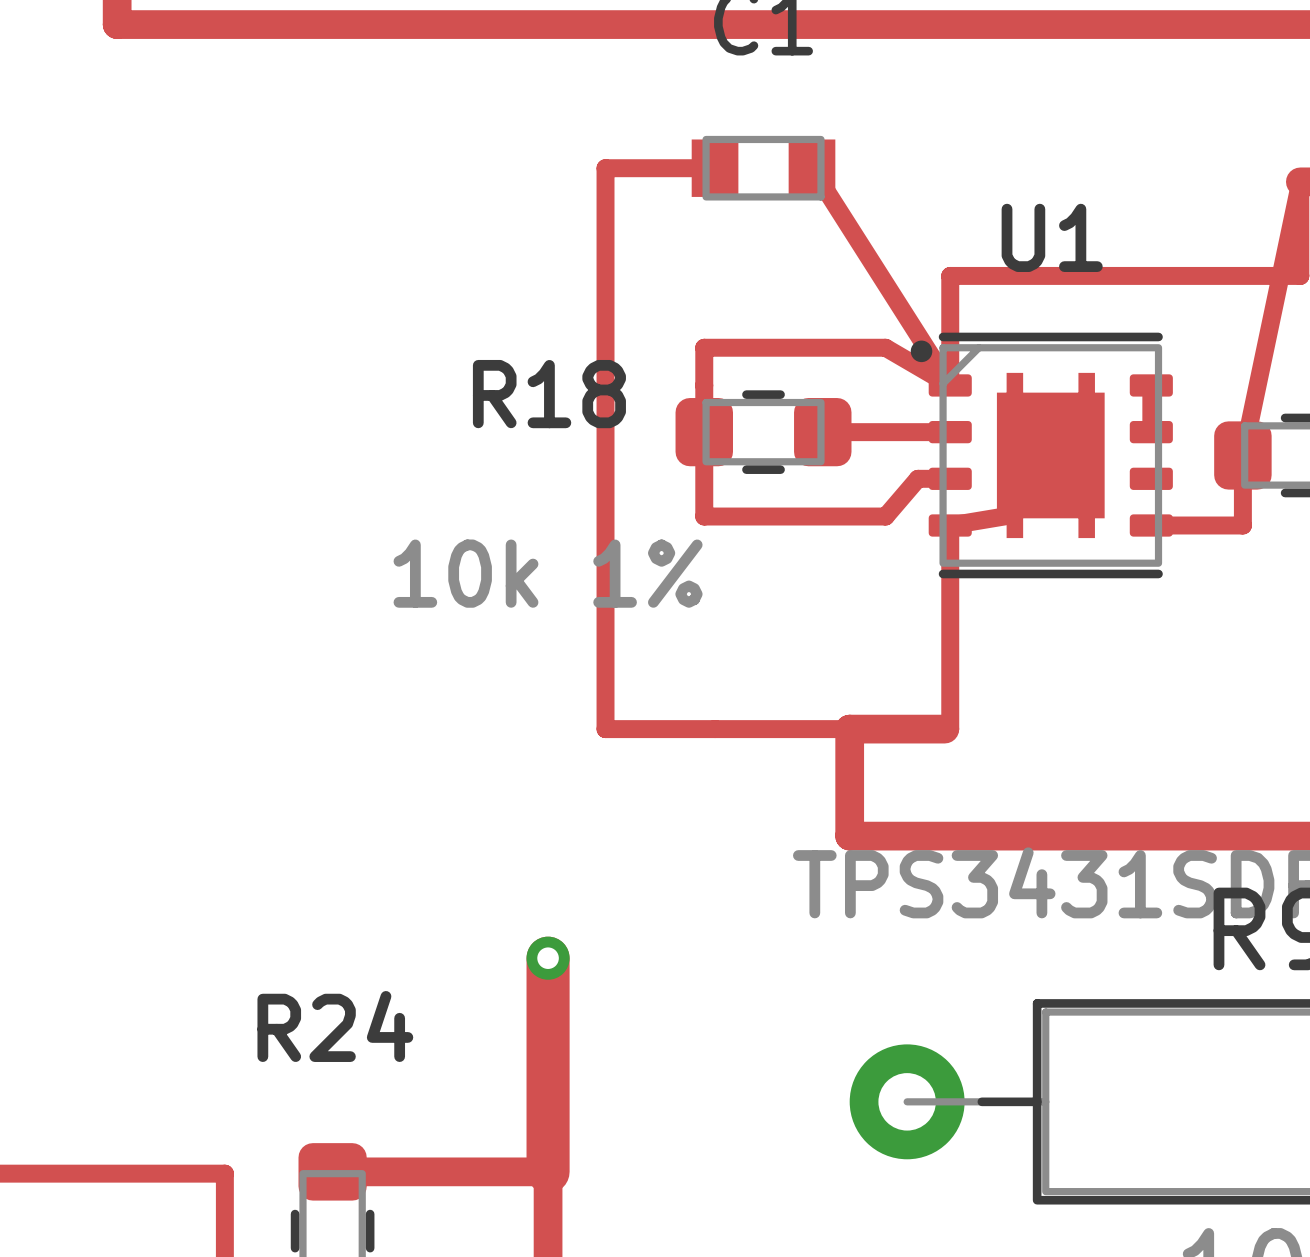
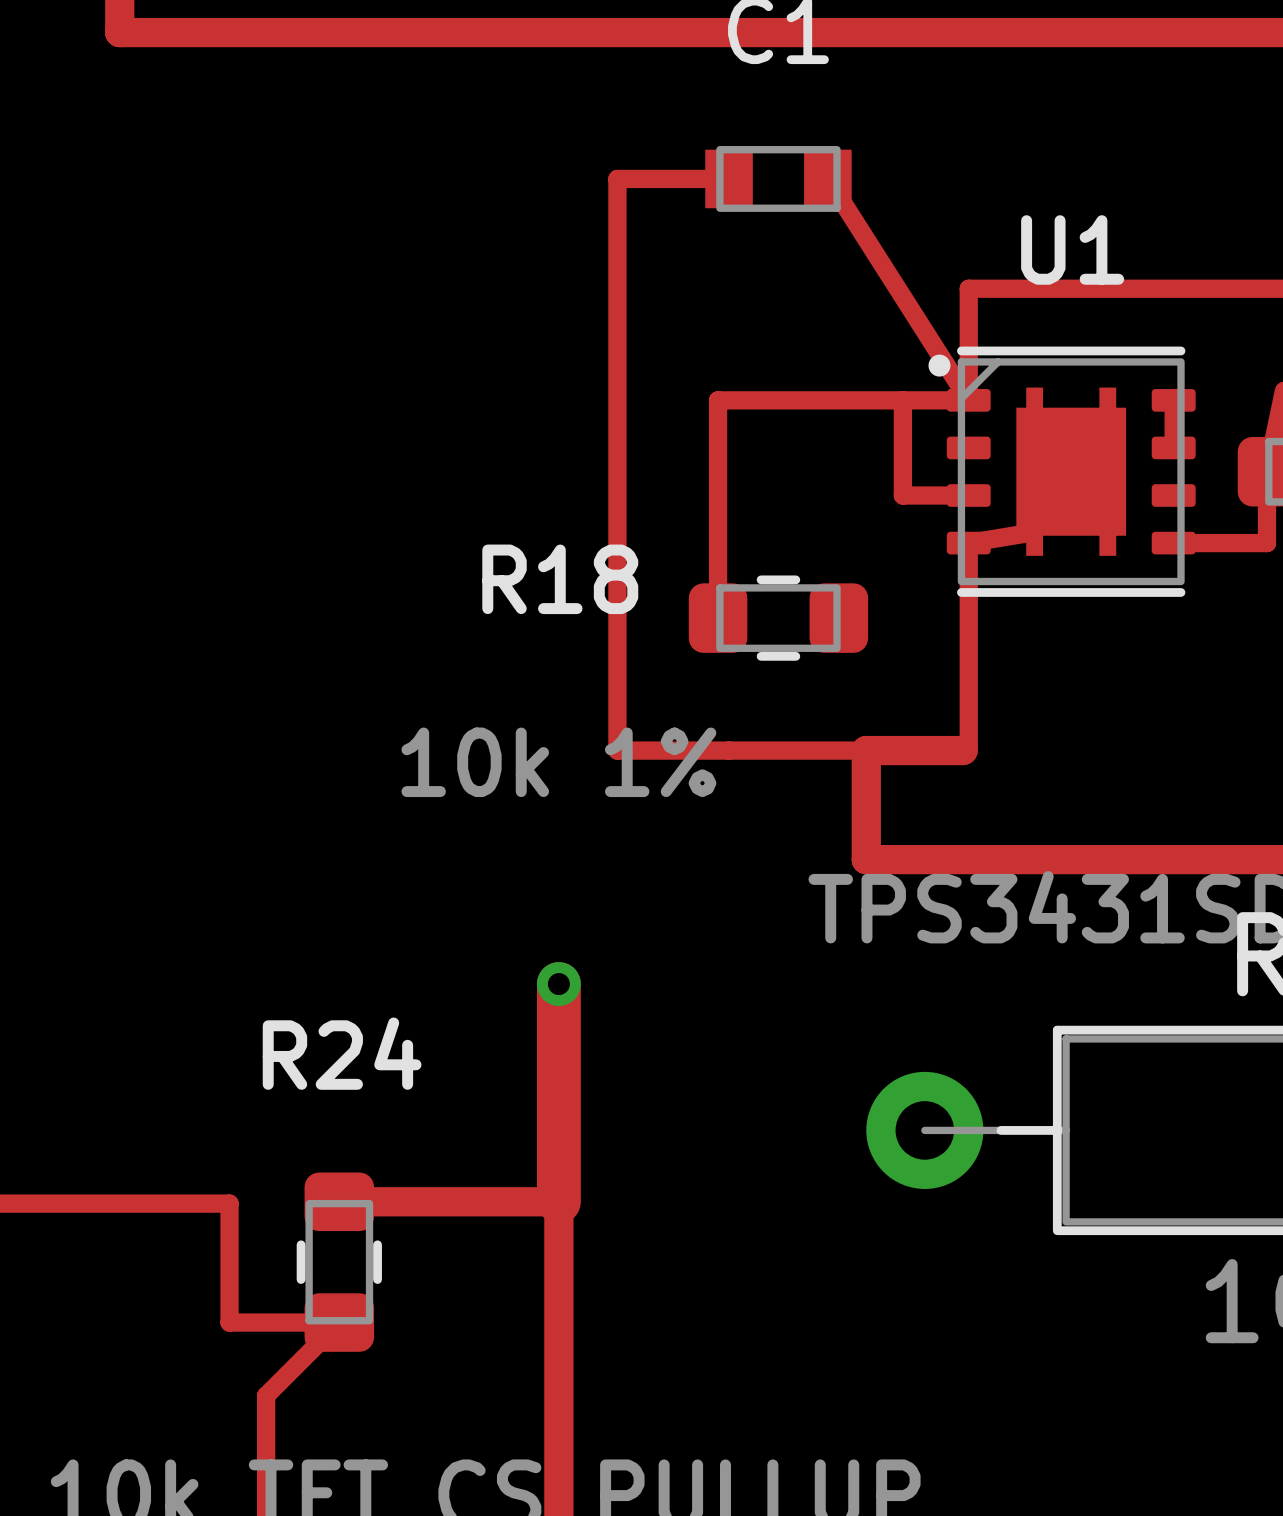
track: (704, 385) (704, 347) (885, 347) (950, 385) -> (718, 400) (968, 400)
R18 position: (763, 432) -> (778, 618)
track: (822, 432) (950, 432) -> none
track: (917, 478) (885, 516) (704, 516) -> (935, 495) (902, 495) (902, 400)
track: none -> (718, 533) (718, 618)

